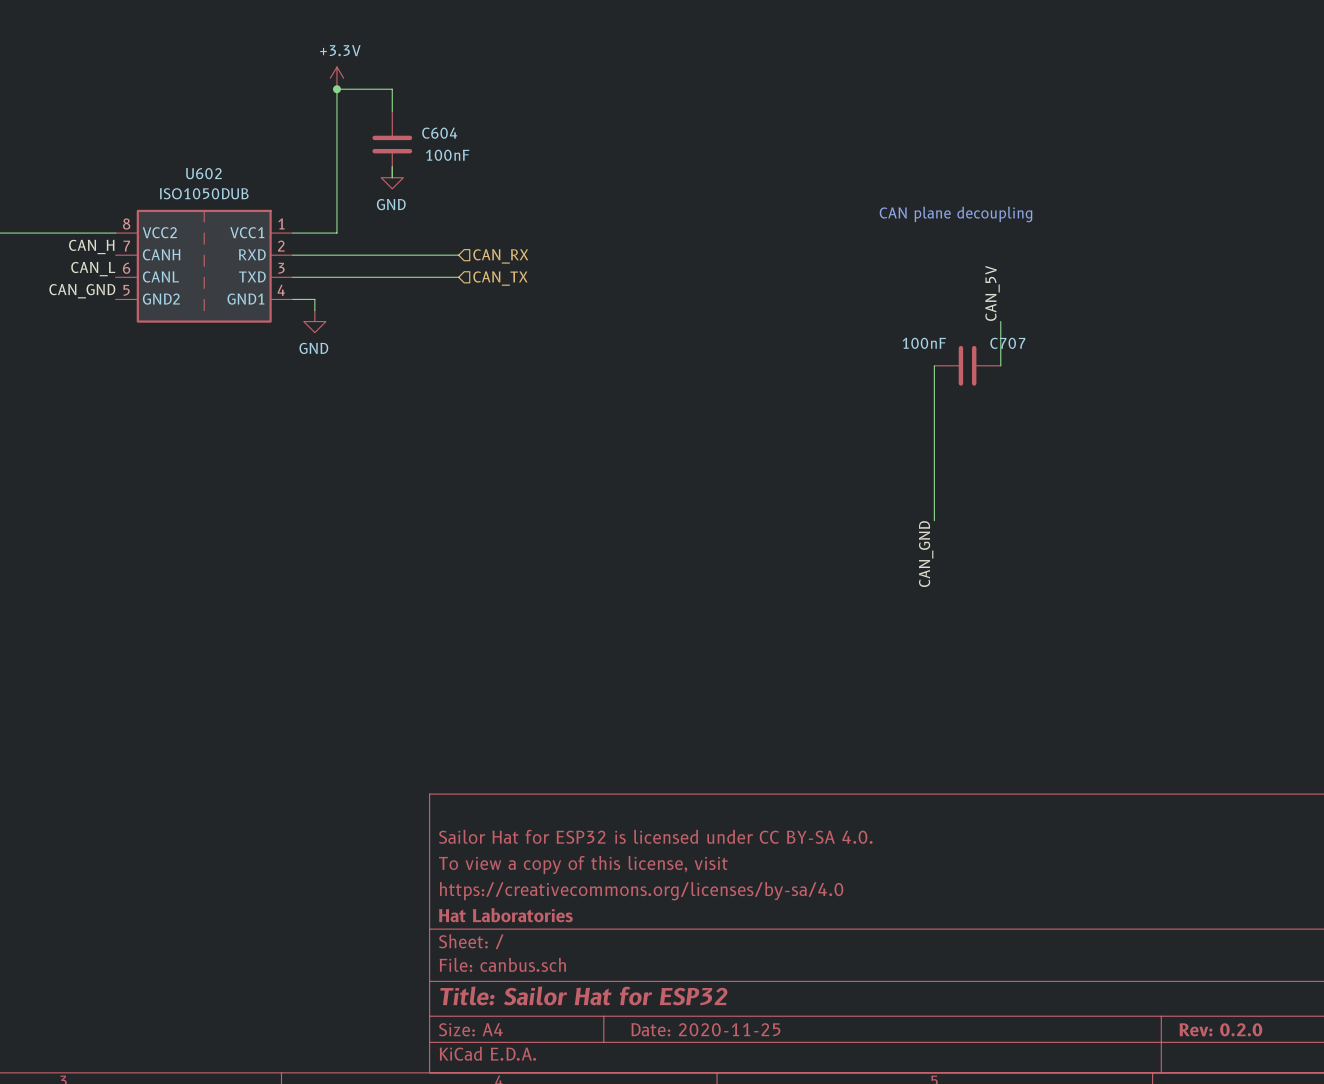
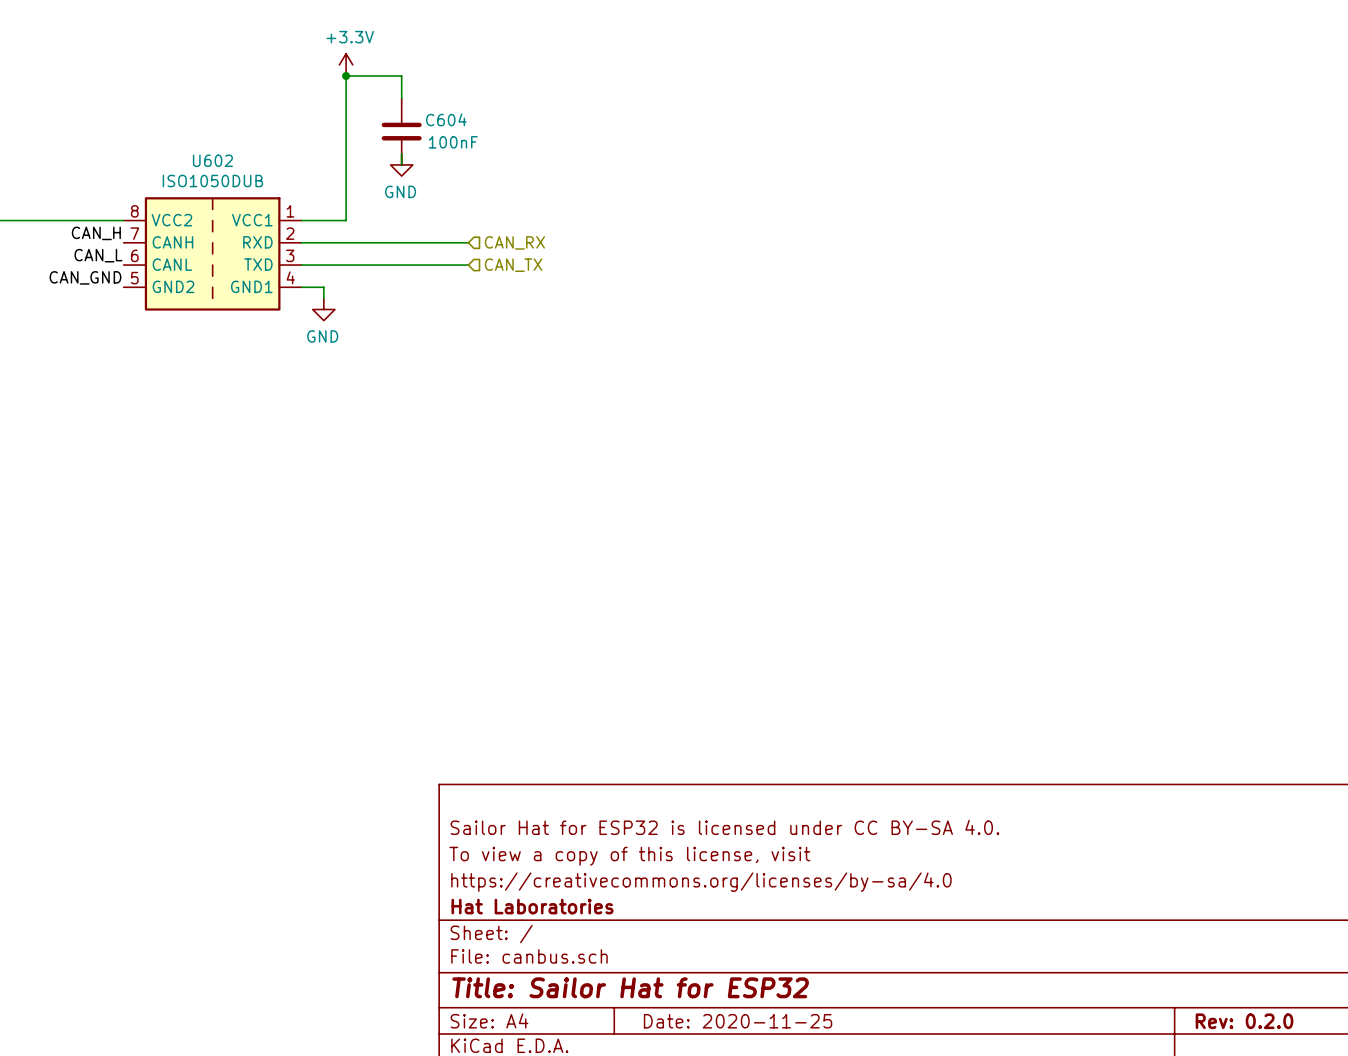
text: CAN plane decoupling (955, 214) -> none
label: CAN_5V (992, 293) -> none
wire: (1000, 321) (1000, 365) -> none
wire: (934, 365) (934, 520) -> none
C707: 100nF (967, 365) -> none
label: CAN_GND (926, 554) -> none

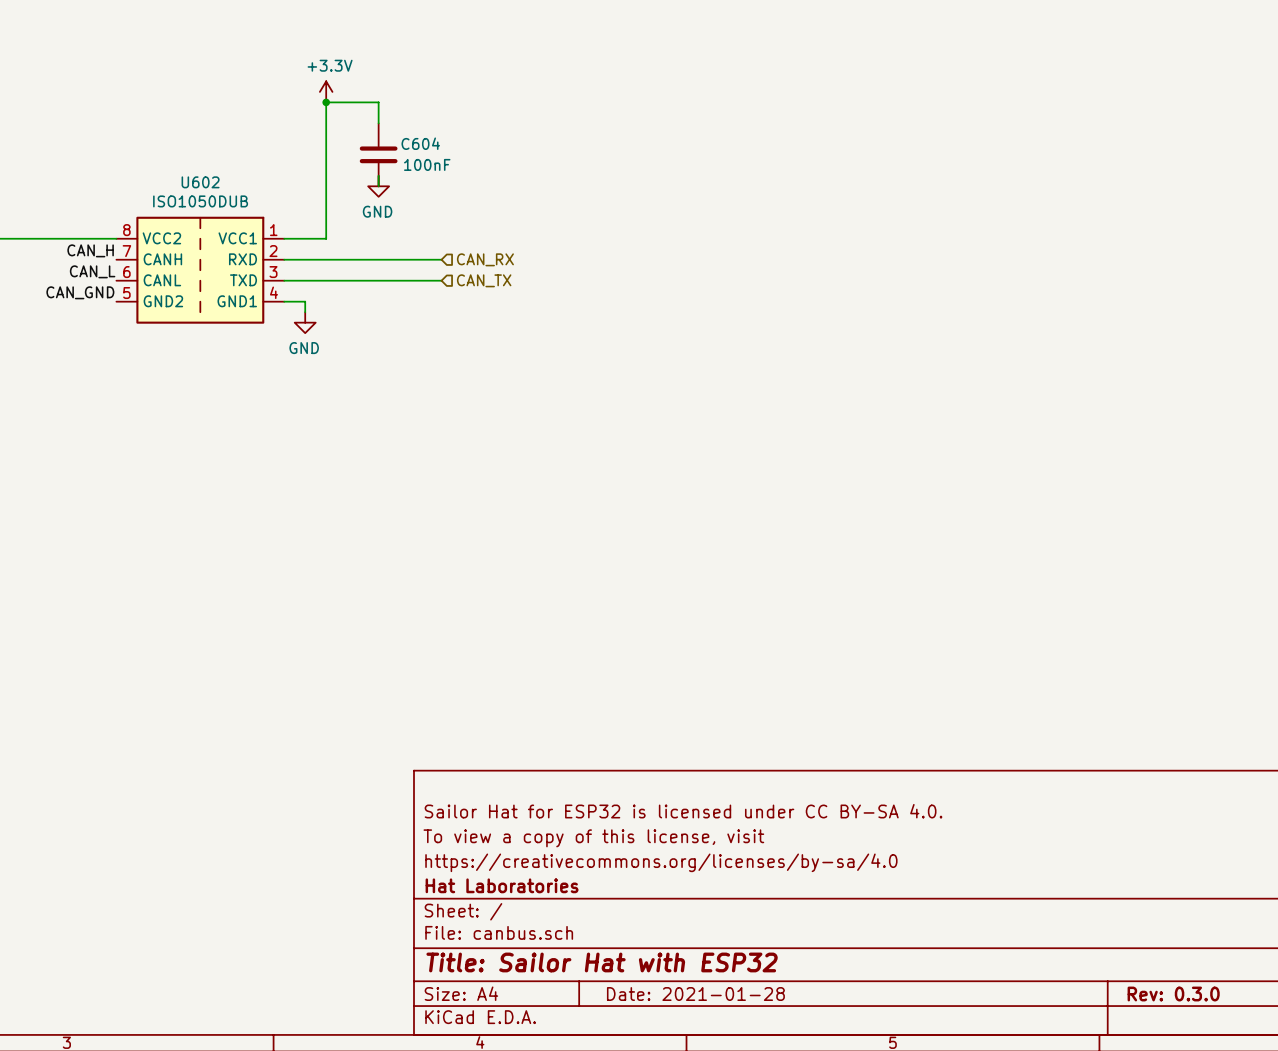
title block: Title: Sailor Hat for ESP32 (630, 987) -> Title: Sailor Hat with ESP32 (602, 962)
title block: Date: 2020-11-25 (738, 1021) -> Date: 2021-01-28 (695, 994)
title block: Rev: 0.2.0 (1244, 1021) -> Rev: 0.3.0 (1173, 994)

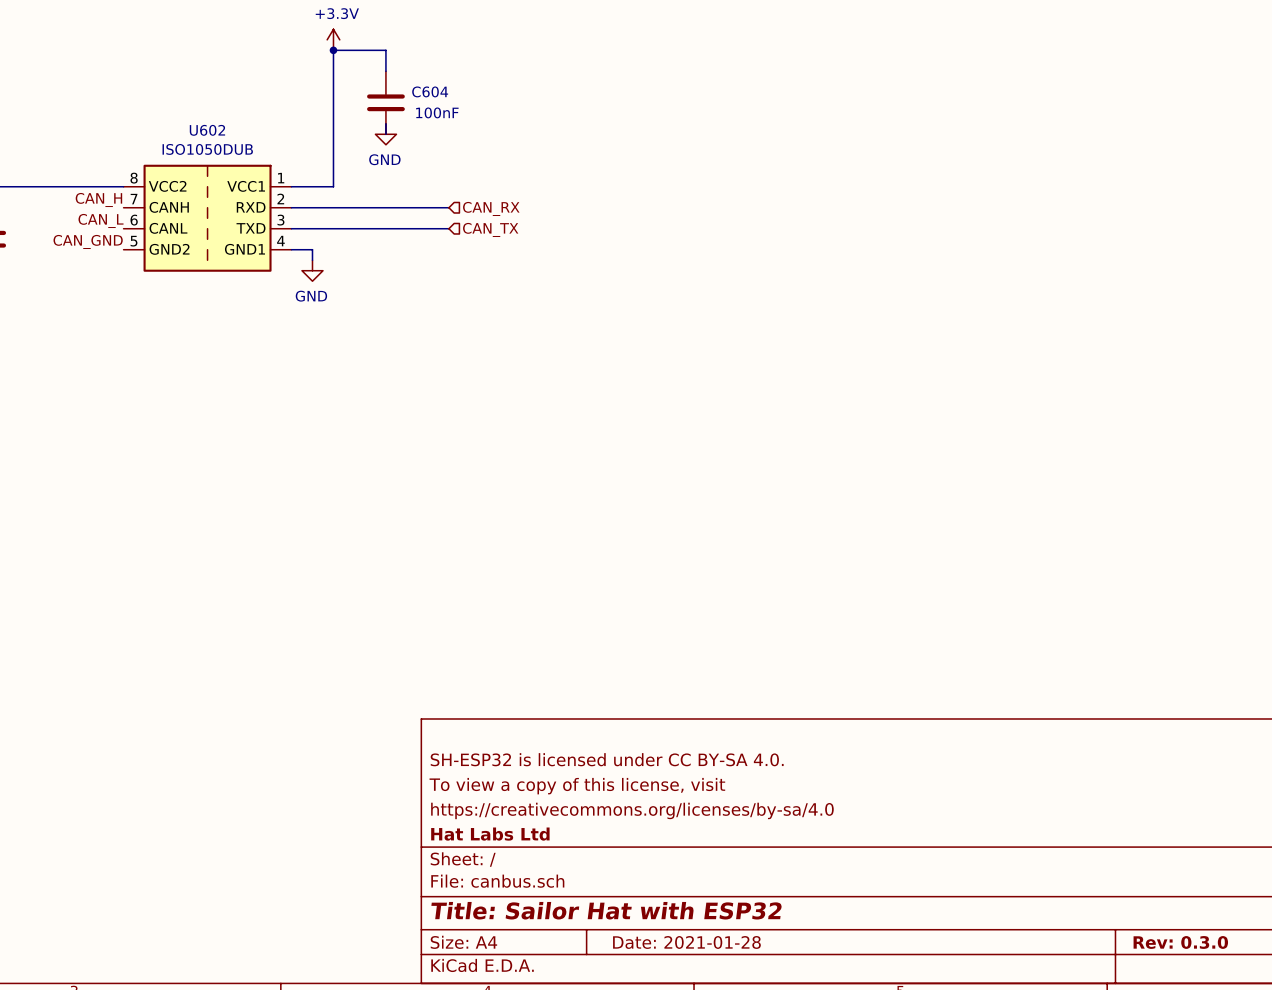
title block: Sailor Hat for ESP32 is licensed under CC BY-SA 4.0. (683, 811) -> SH-ESP32 is licensed under CC BY-SA 4.0. (607, 759)
title block: Hat Laboratories (502, 885) -> Hat Labs Ltd (490, 834)

